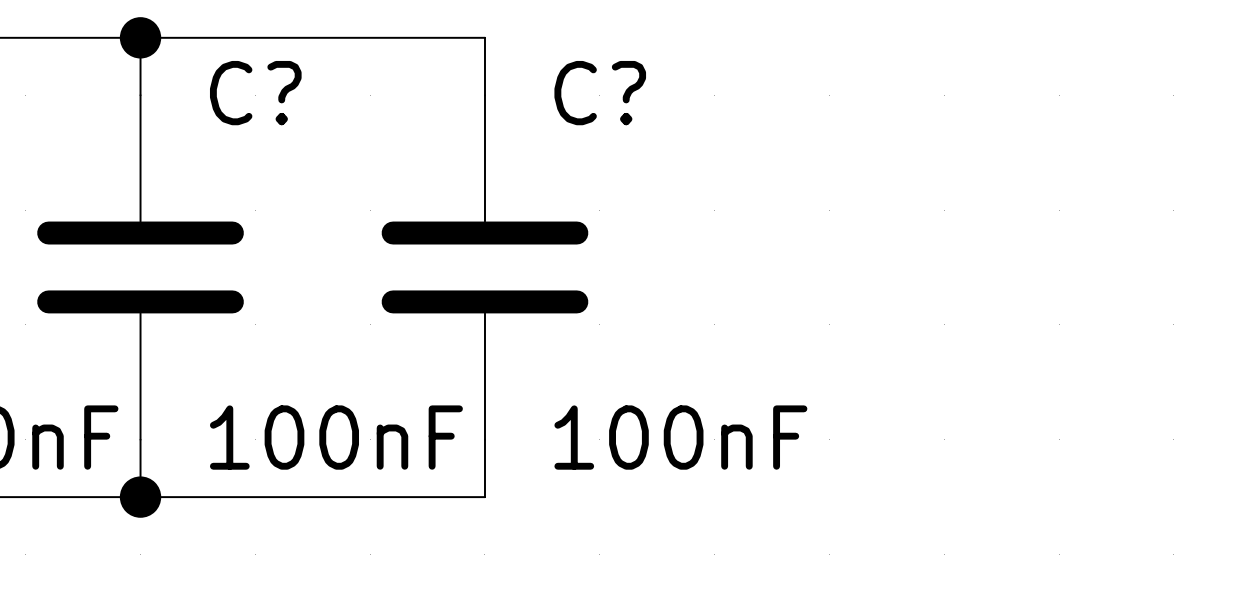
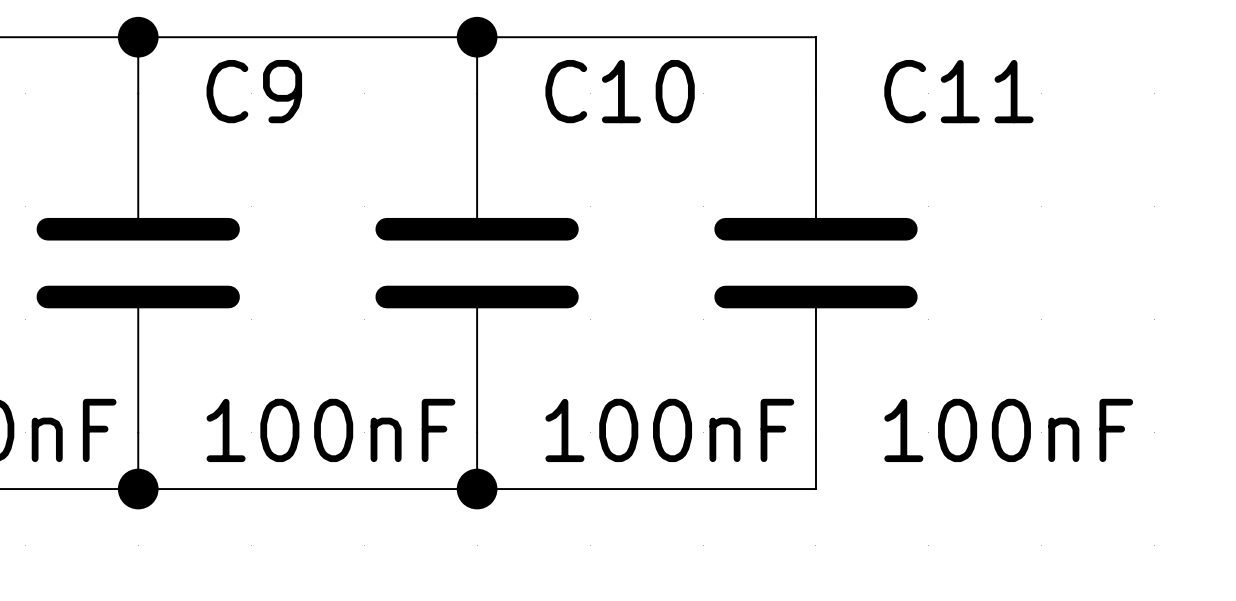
wire: none -> (477, 37) (815, 37) (815, 93)
junction: none -> (477, 37)
C? name: C? (255, 93) -> C9 (254, 91)
C? name: C? (600, 93) -> C10 (620, 91)
C11: none -> 100nF (815, 263)
wire: none -> (815, 432) (815, 489) (477, 489)
junction: none -> (477, 489)

